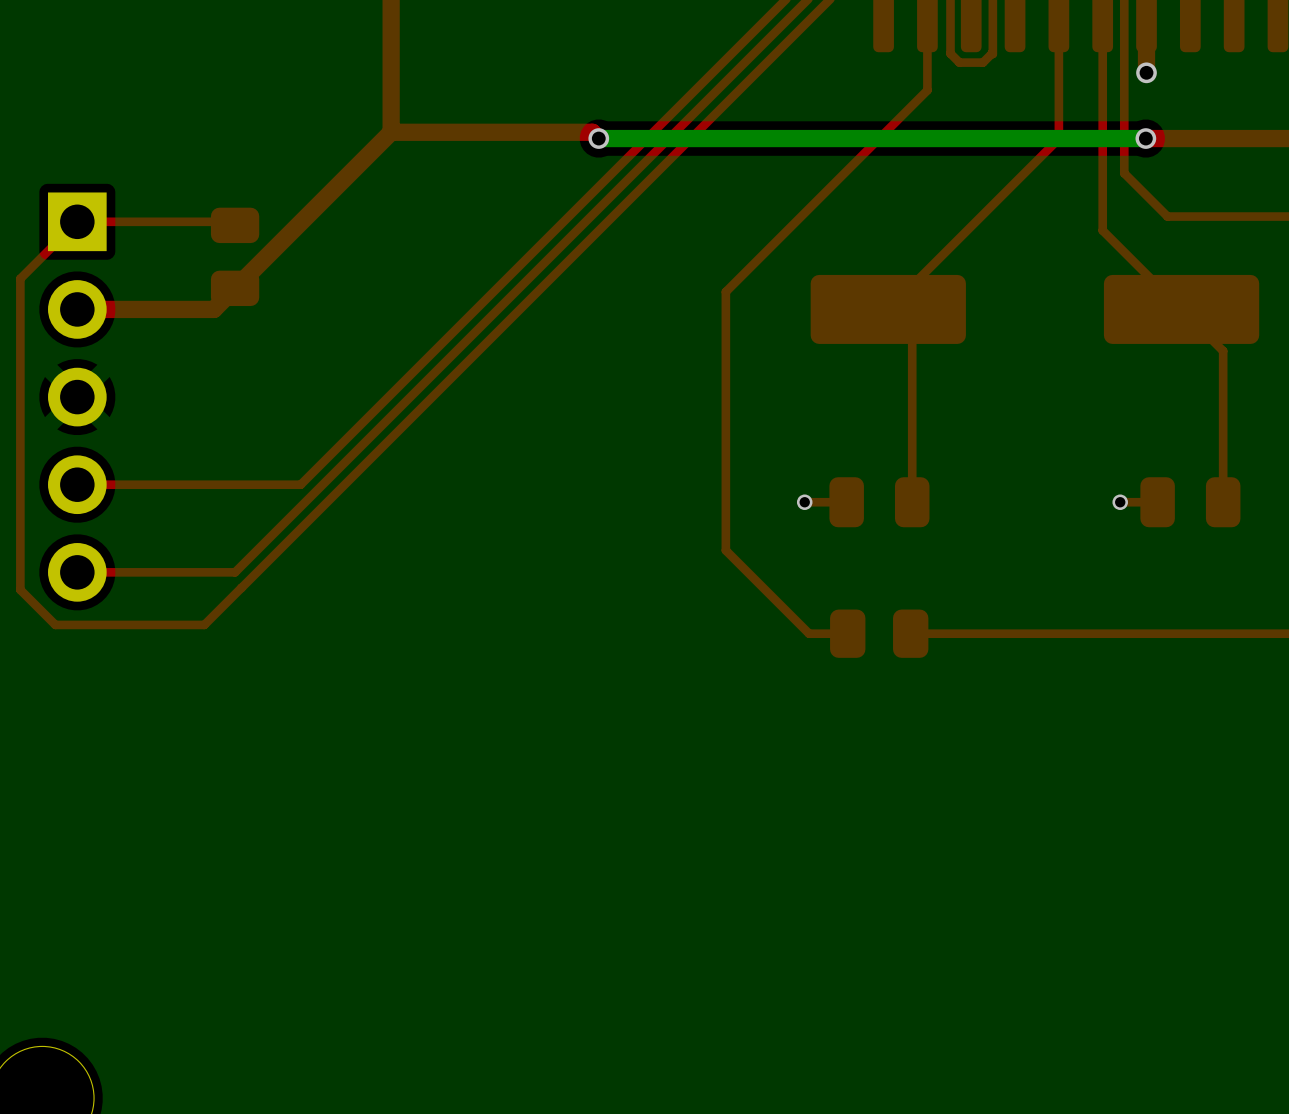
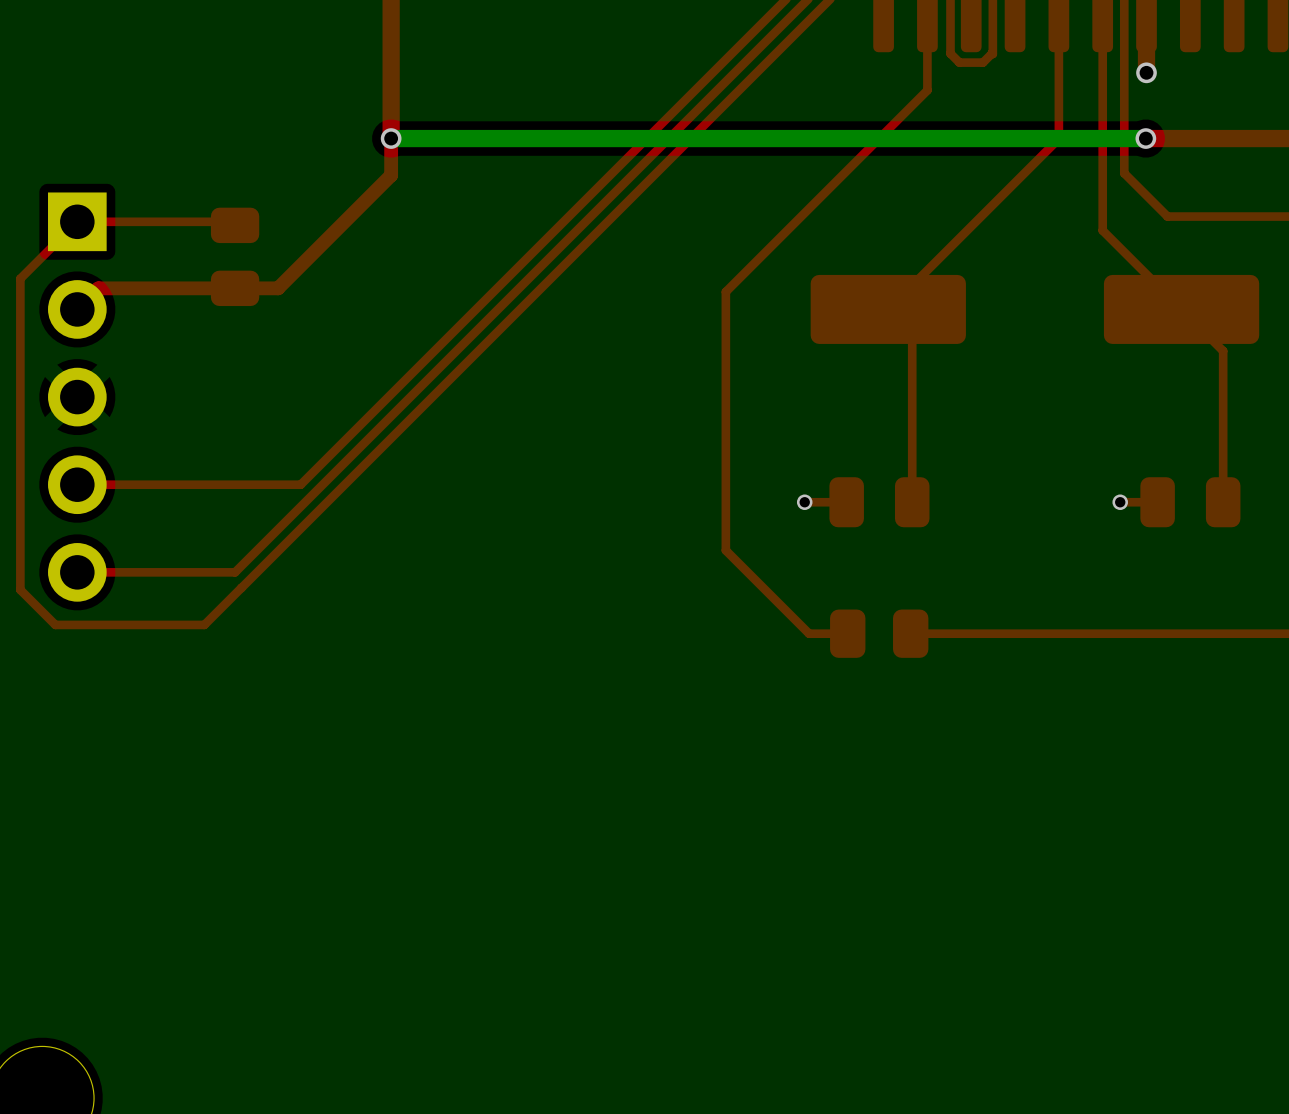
via: none -> (391, 138)
top track: (598, 138) (592, 132) (391, 132) (213, 309) (77, 309) -> (391, 132) (391, 175) (278, 288) (98, 288) (77, 309)
bottom track: none -> (598, 138) (391, 138)
via: (598, 138) -> none

